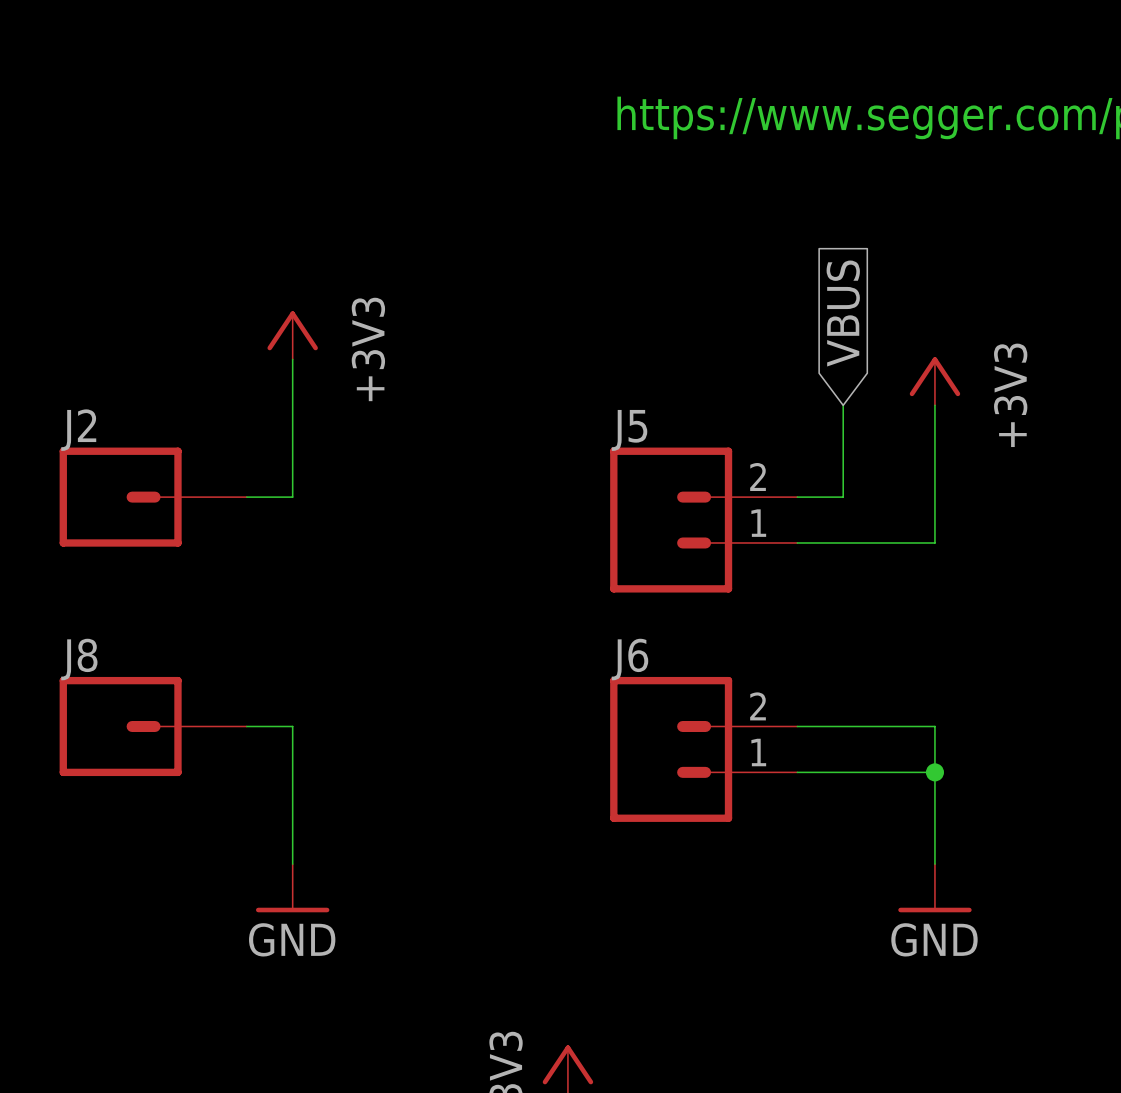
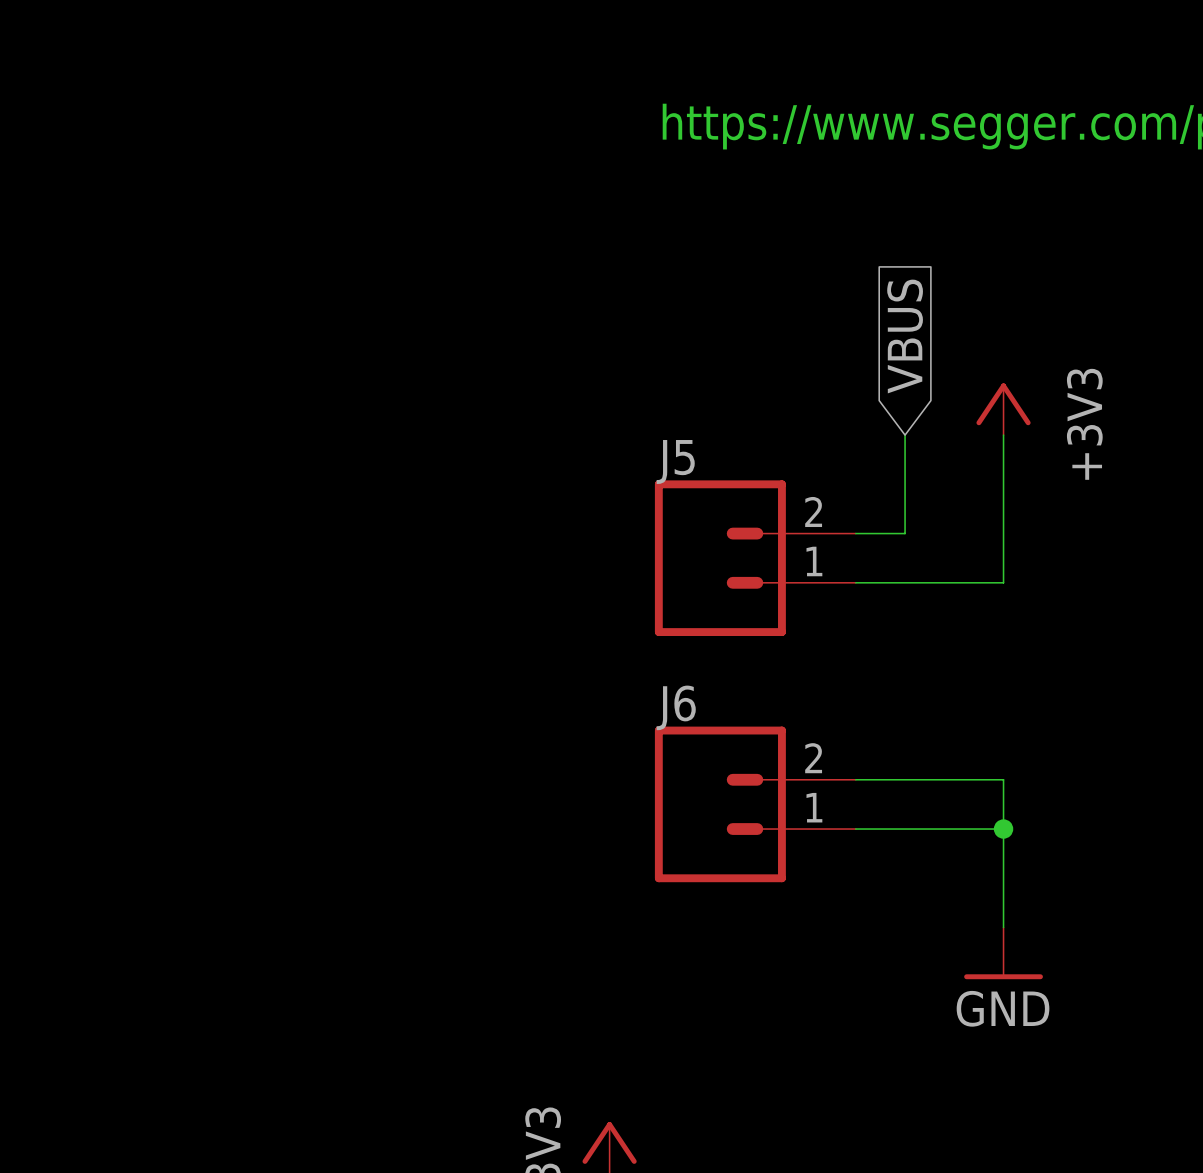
power symbol: +3V3 (292, 335) -> none
wire: (292, 359) (292, 497) (246, 497) -> none
J2: (153, 497) -> none
J8: (153, 726) -> none
wire: (246, 726) (292, 726) (292, 864) -> none
power symbol: GND (292, 888) -> none

